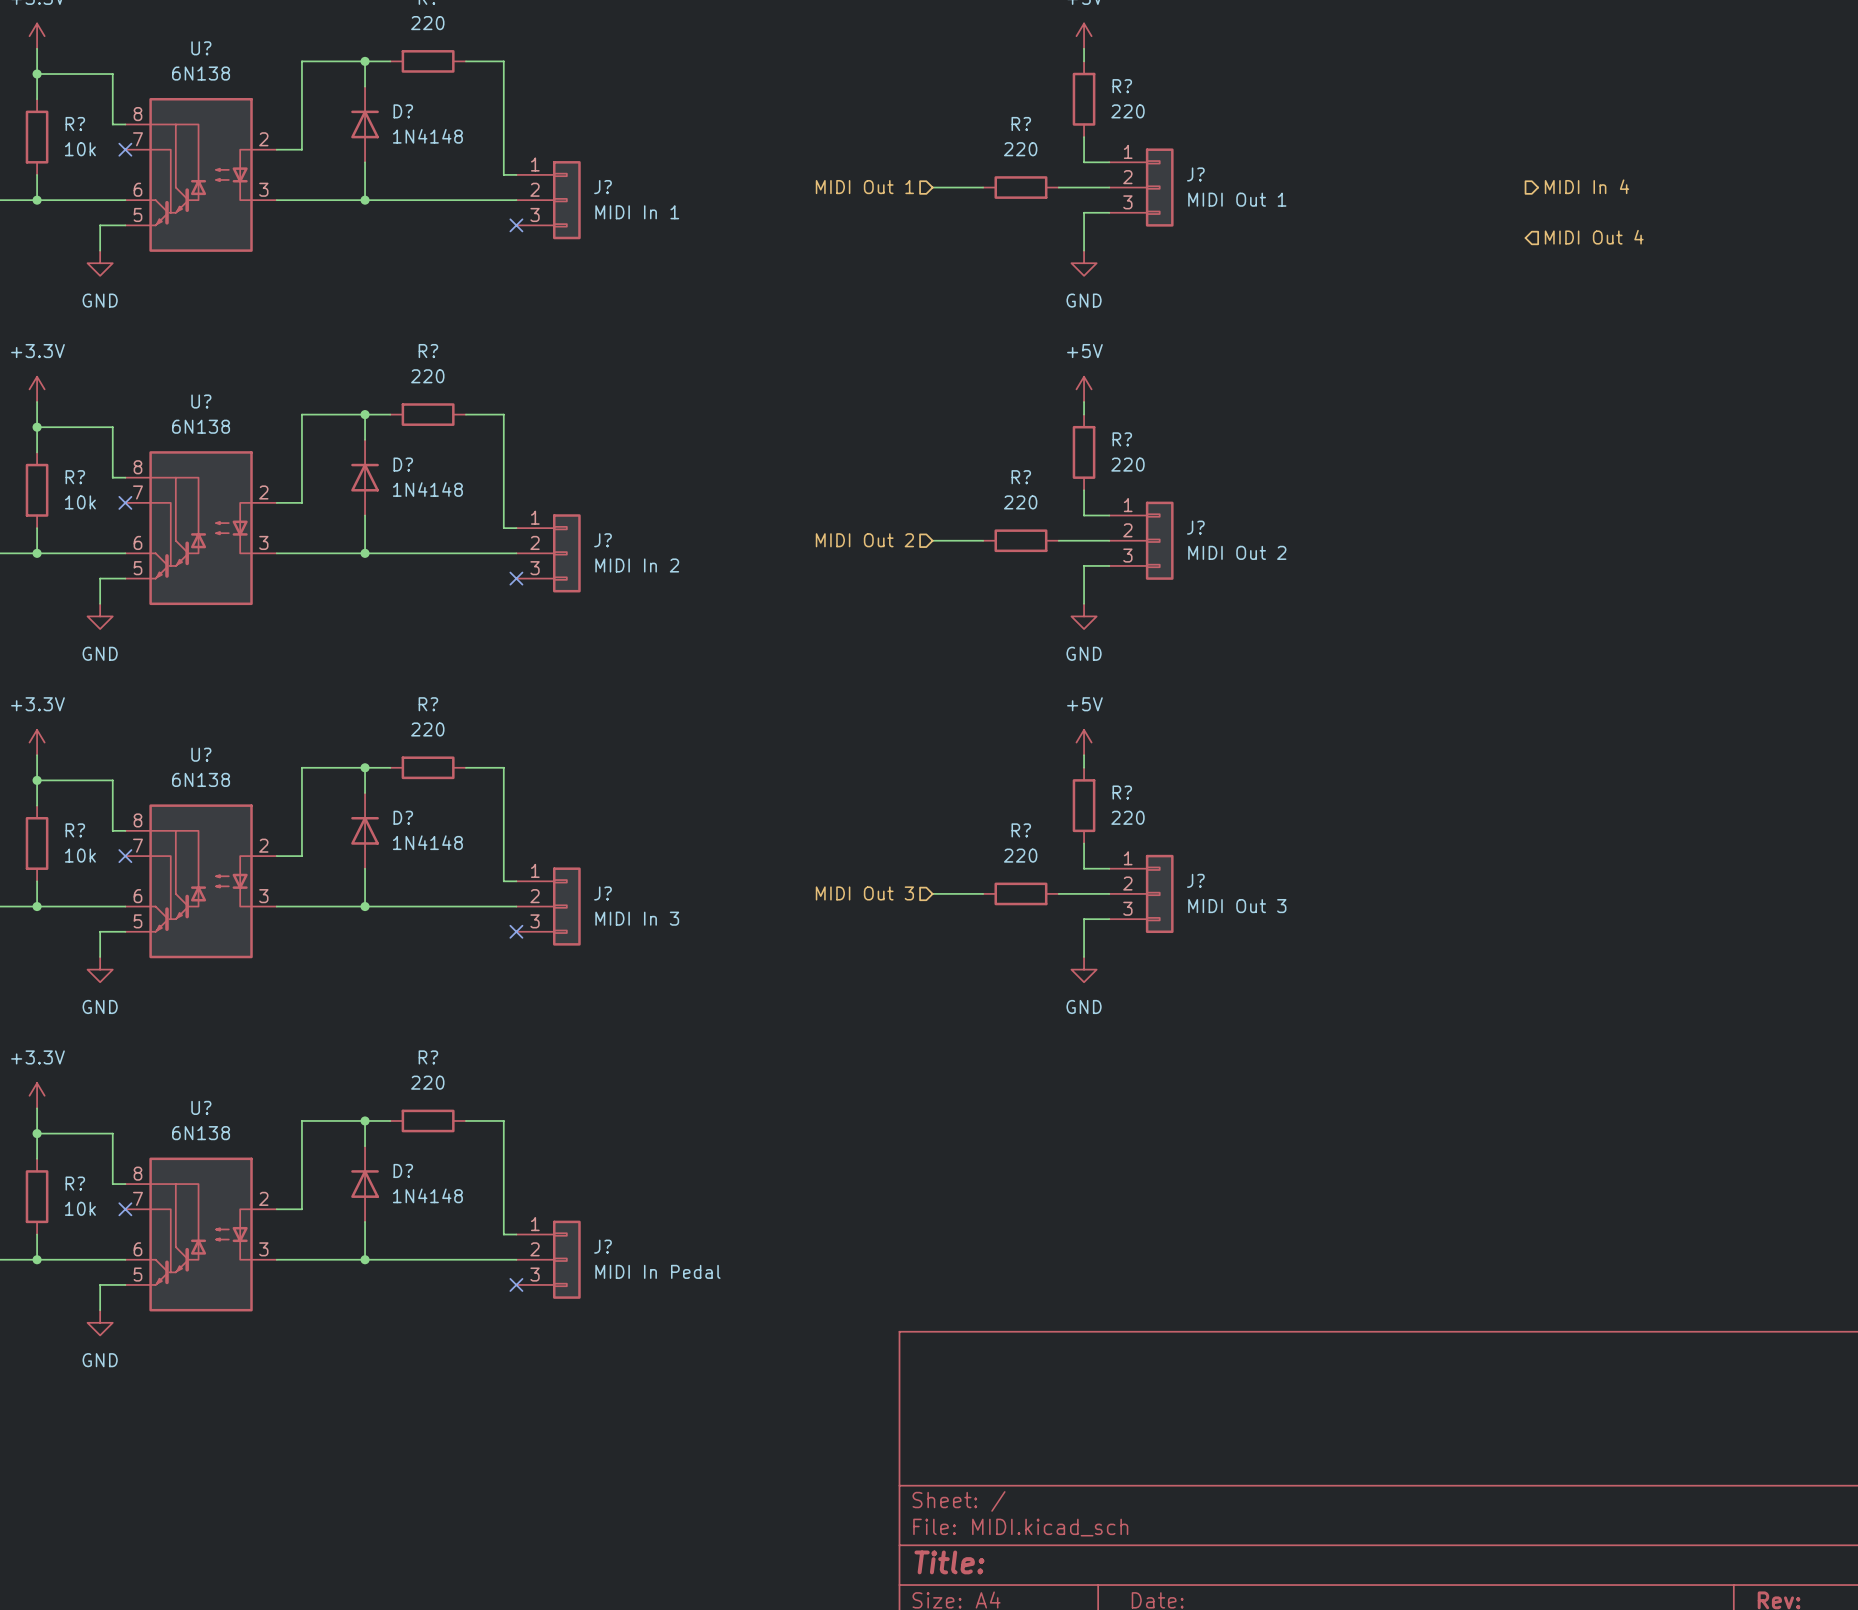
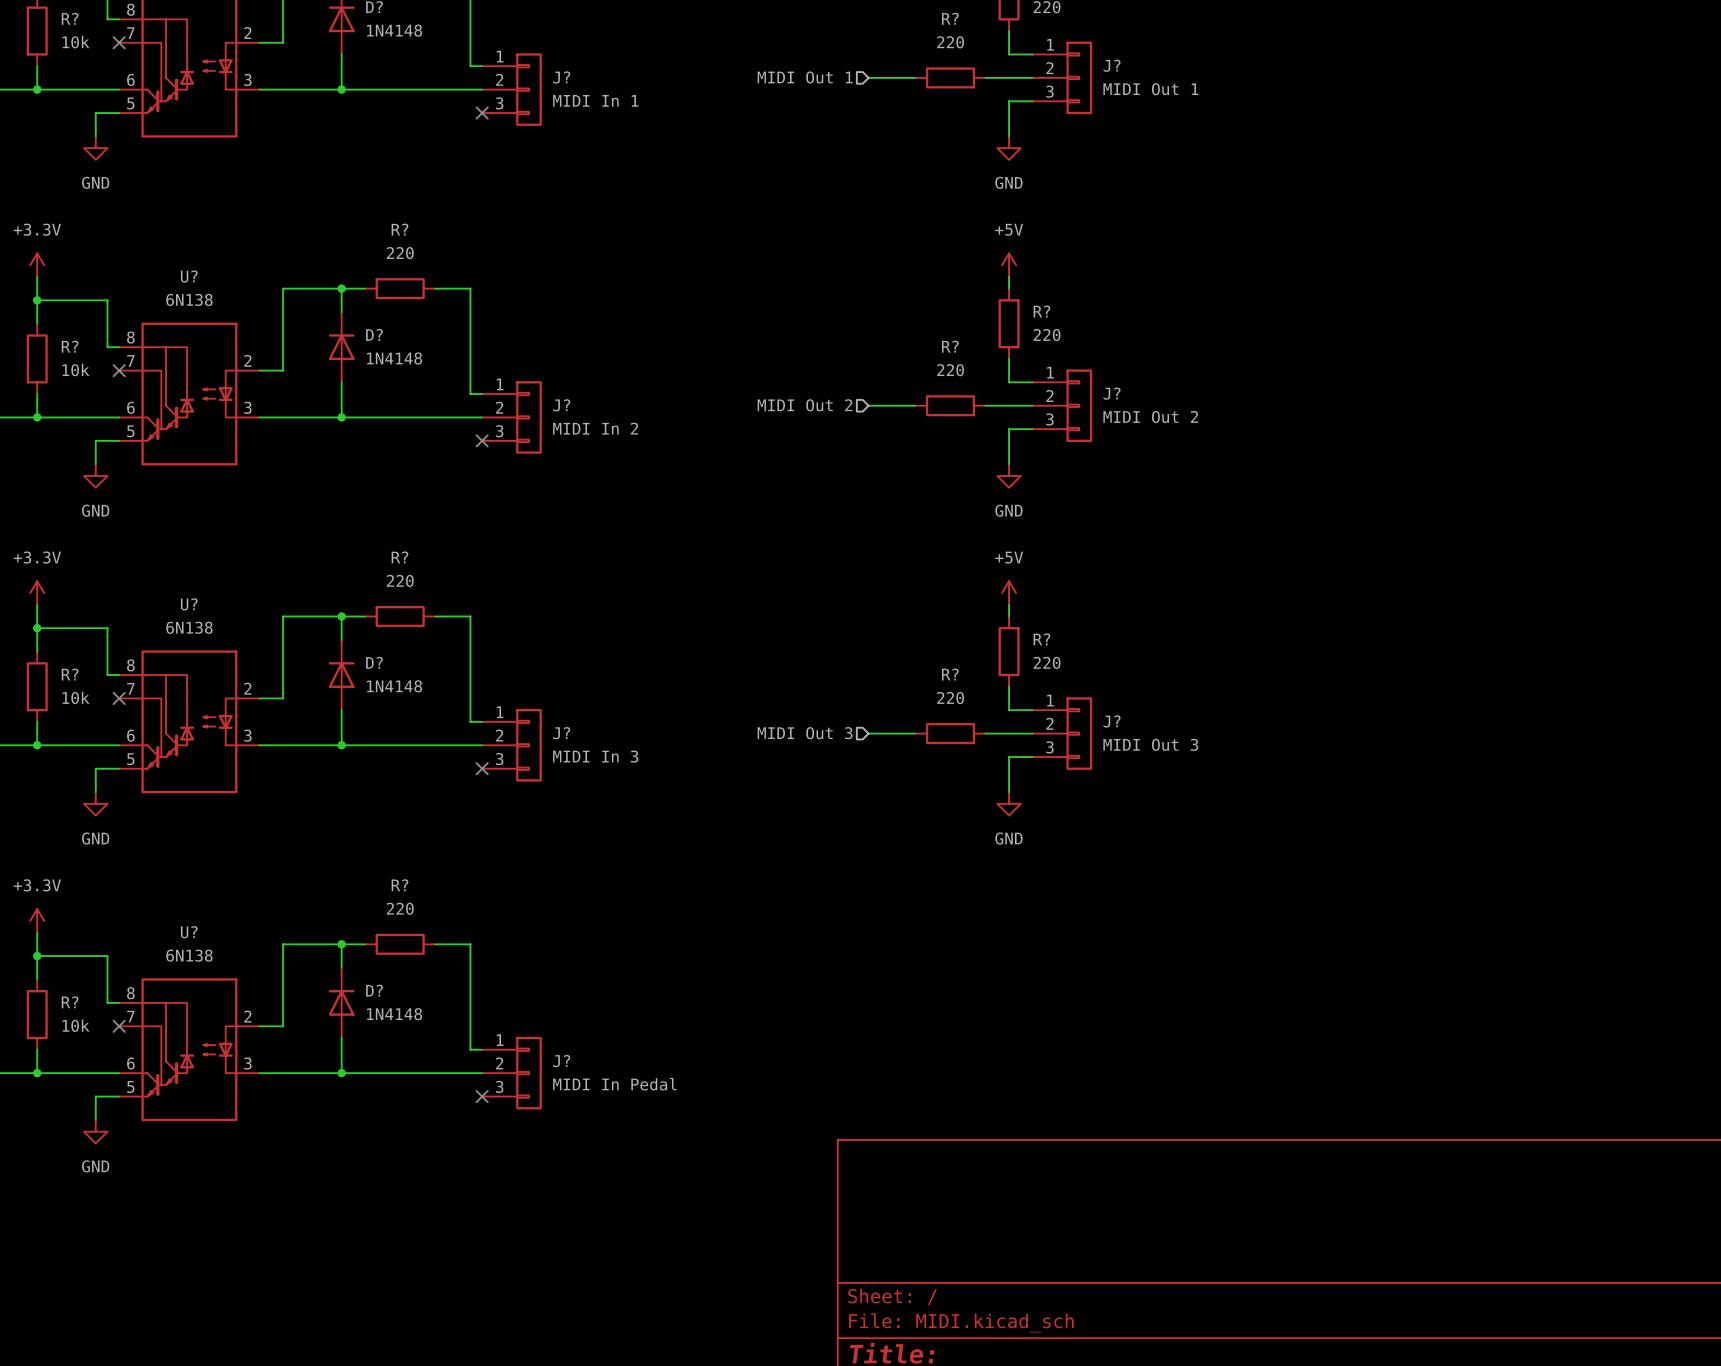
hierarchical label: MIDI In 4 (1587, 186) -> none
hierarchical label: MIDI Out 4 (1594, 237) -> none

